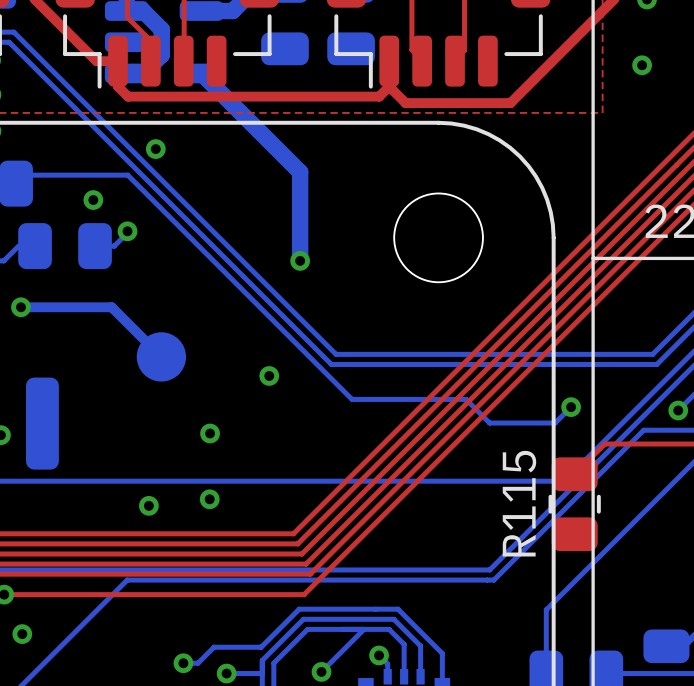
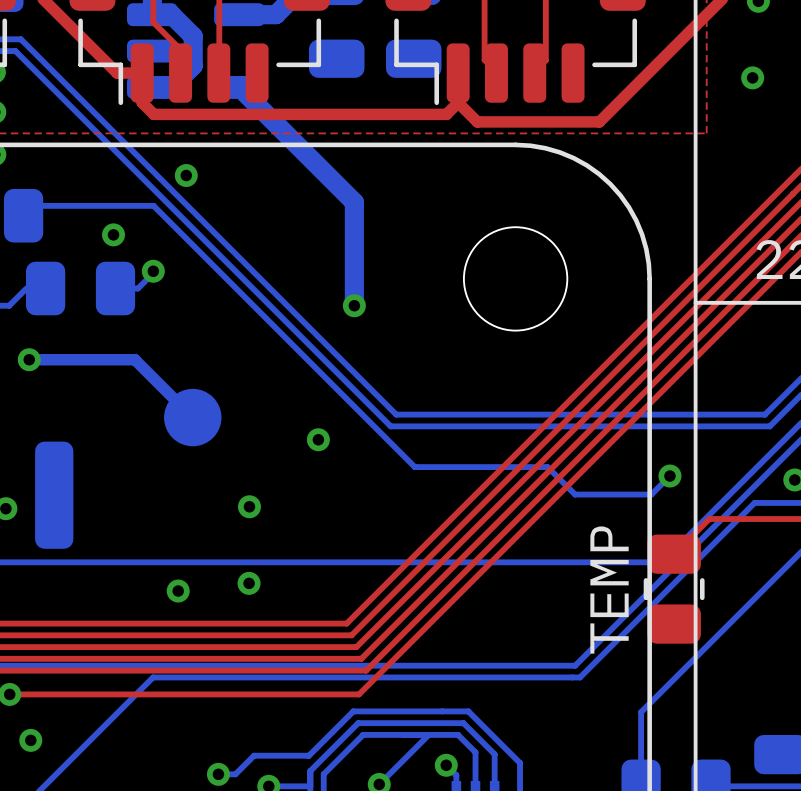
R115 name: R115 (519, 503) -> TEMP (609, 590)

